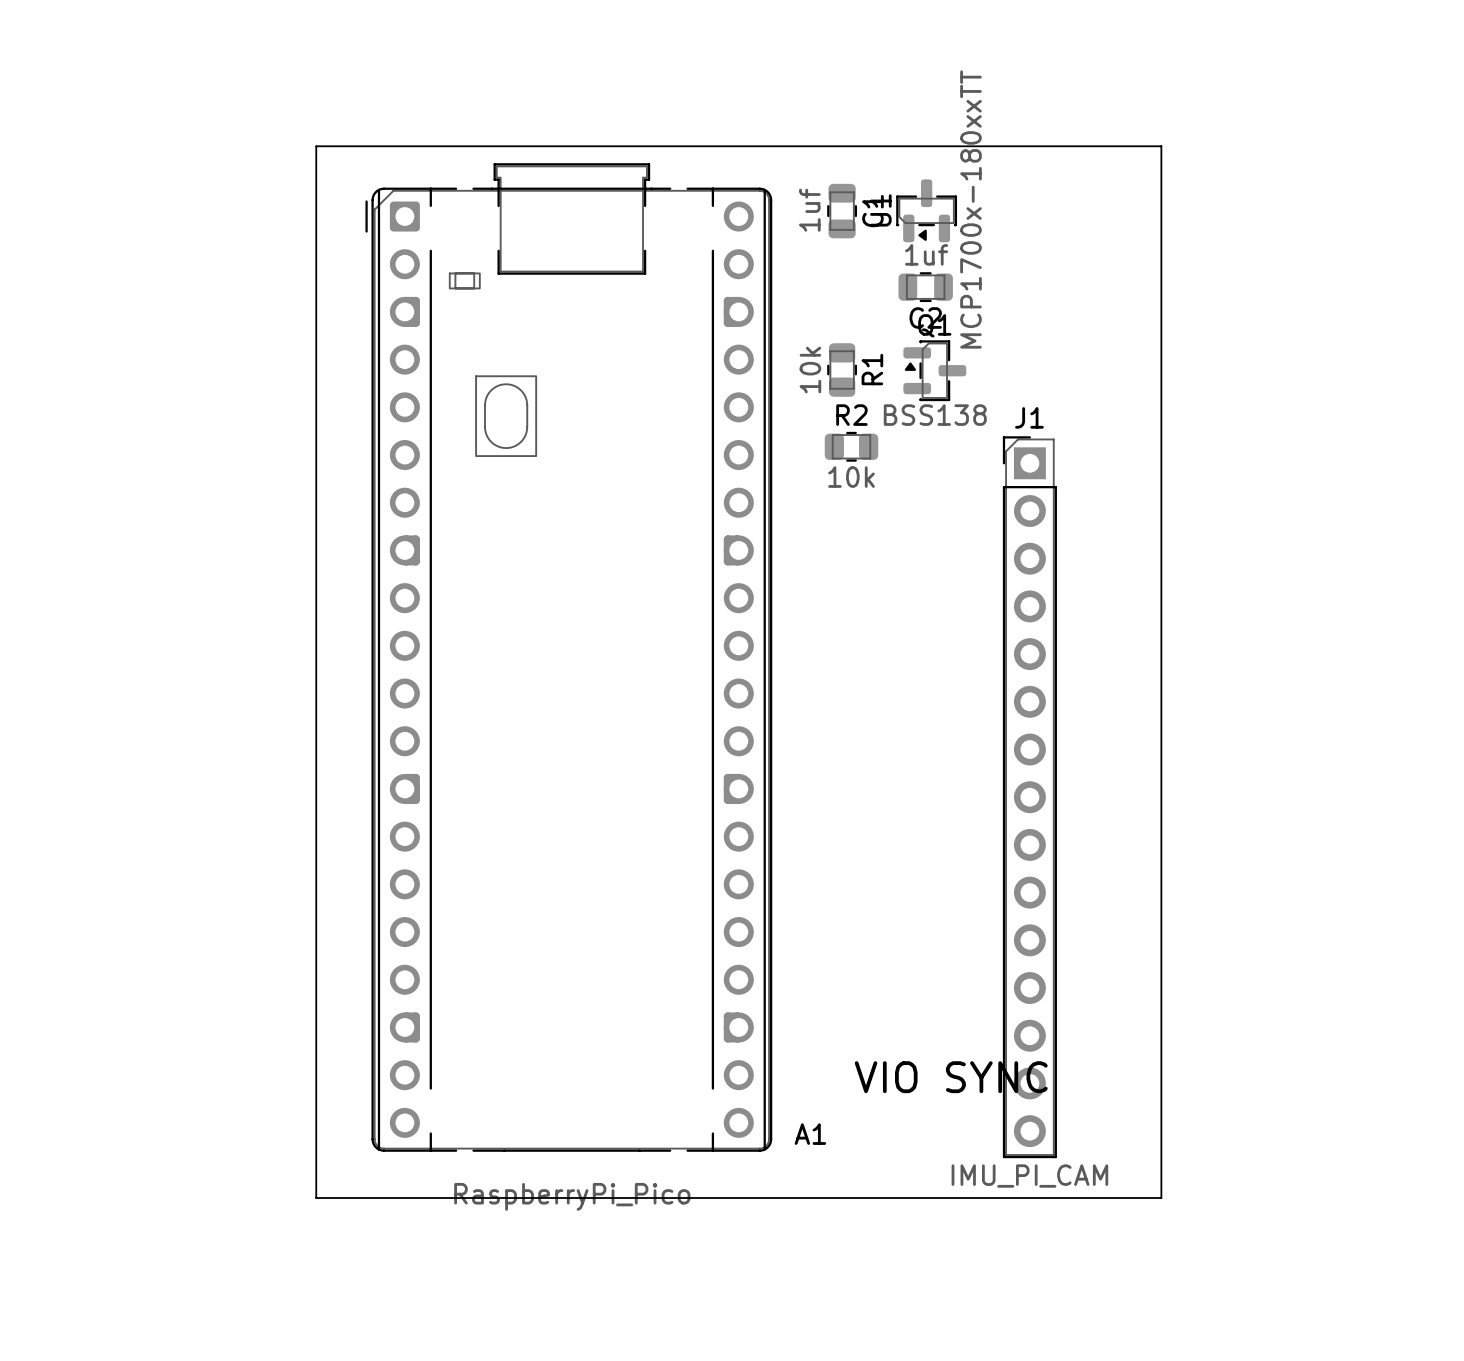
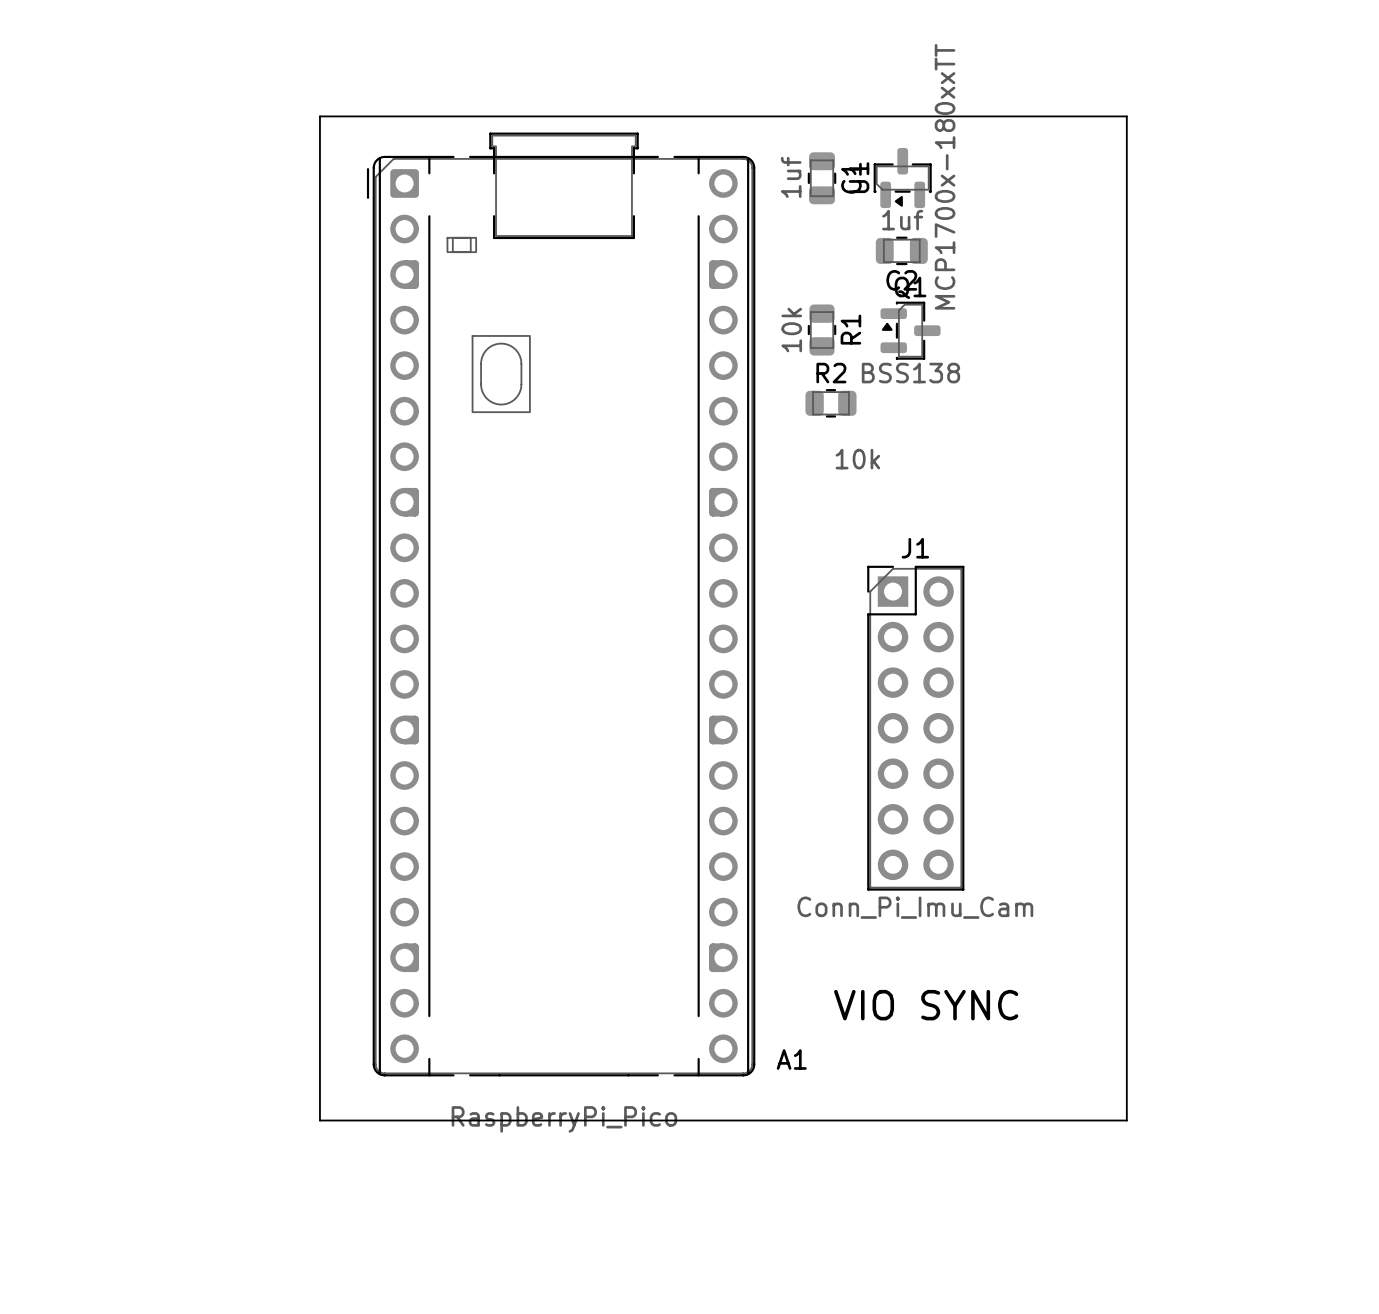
J1 name position: J1 (1029, 417) -> J1 (915, 548)
J1 footprint: [1002, 436, 1057, 1159] -> [867, 565, 965, 891]
R2 value position: 10k (851, 477) -> 10k (857, 459)
J1 value: IMU_PI_CAM (1029, 1176) -> Conn_Pi_Imu_Cam (915, 907)

